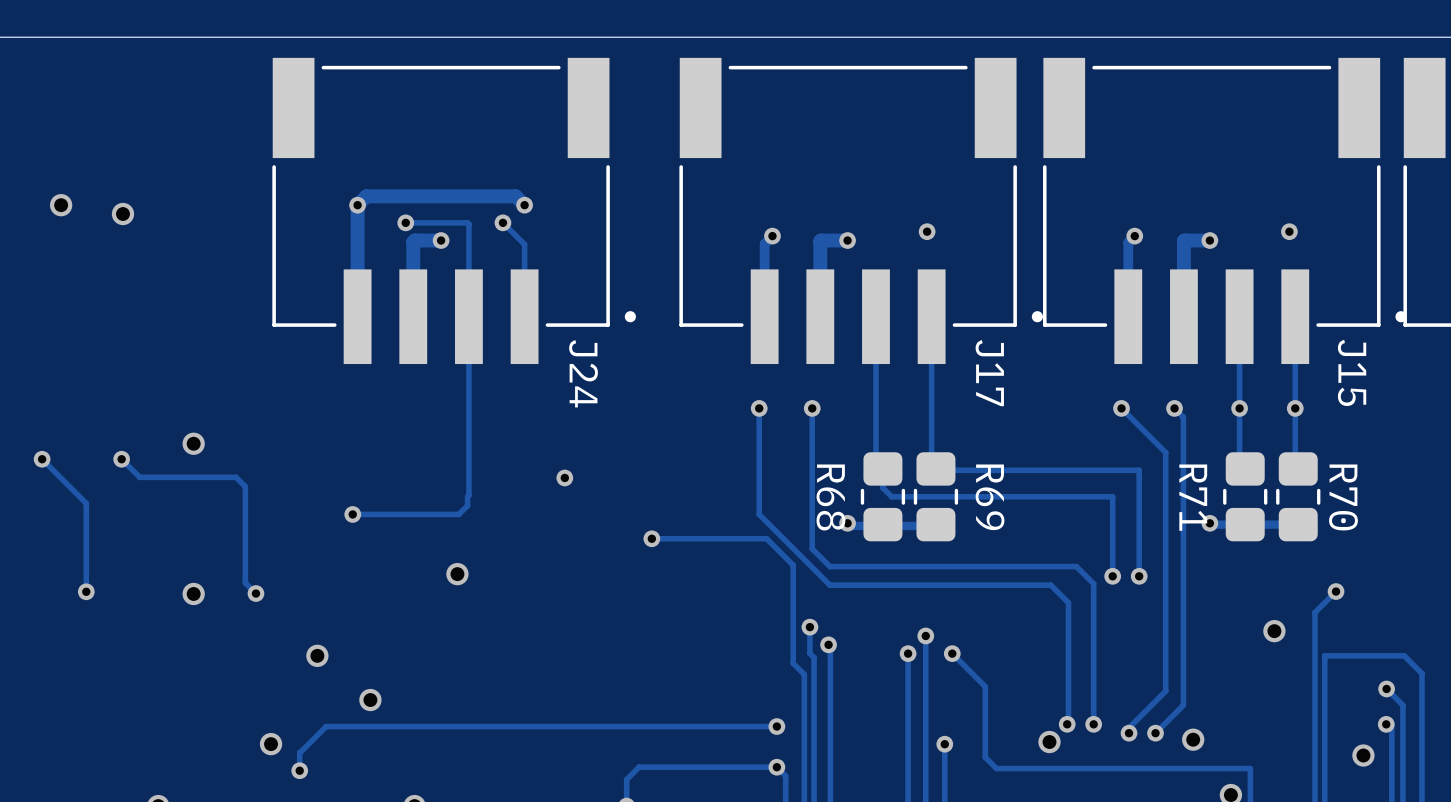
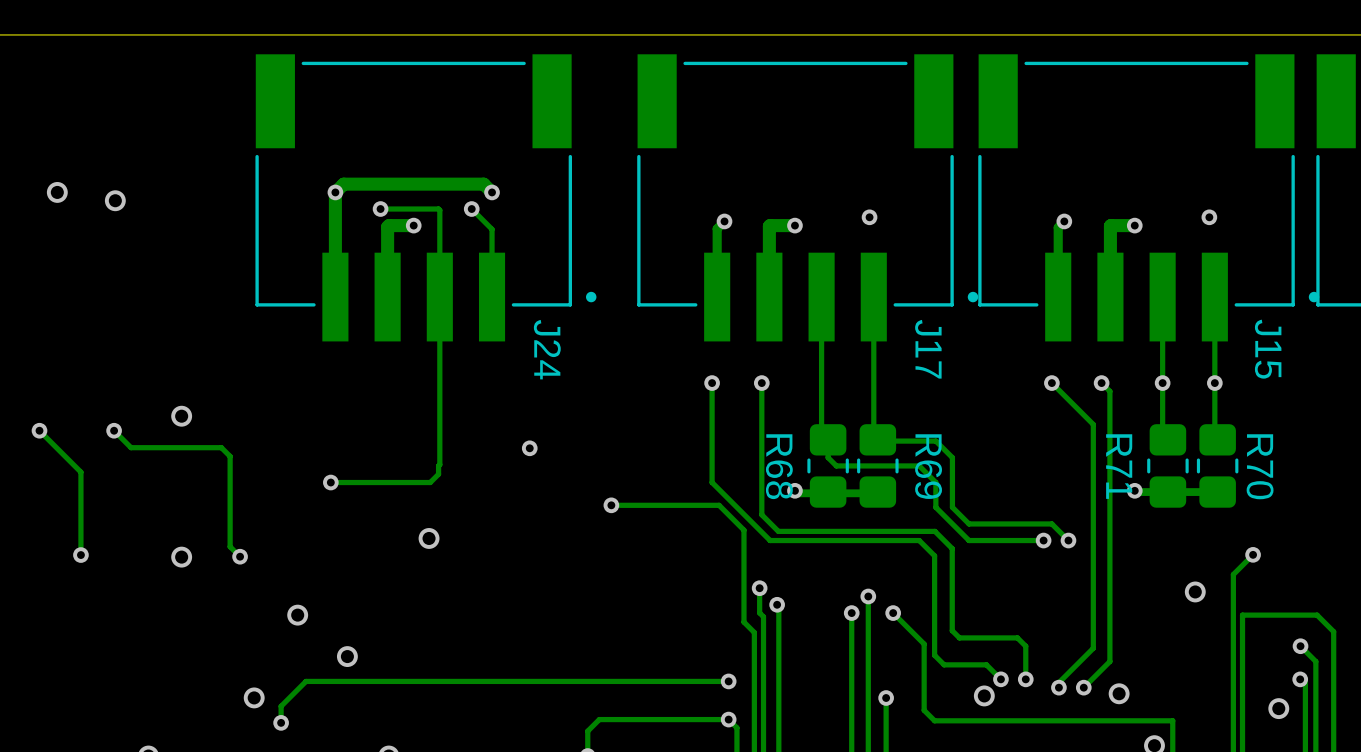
track: (997, 470) (1139, 470) (1139, 576) -> (935, 441) (952, 457) (952, 507) (969, 523) (1051, 523) (1068, 540)
track: (980, 496) (1112, 496) (1112, 576) -> (919, 465) (935, 482) (935, 507) (969, 540) (1043, 540)
track: (996, 566) (1076, 566) (1093, 583) (1093, 688) -> (935, 531) (952, 548) (952, 630) (959, 637) (1017, 637) (1025, 646)
track: (821, 576) (829, 585) (1050, 585) (1068, 602) (1067, 724) -> (770, 540) (919, 540) (934, 555) (934, 655) (944, 664) (986, 664) (1000, 679)

